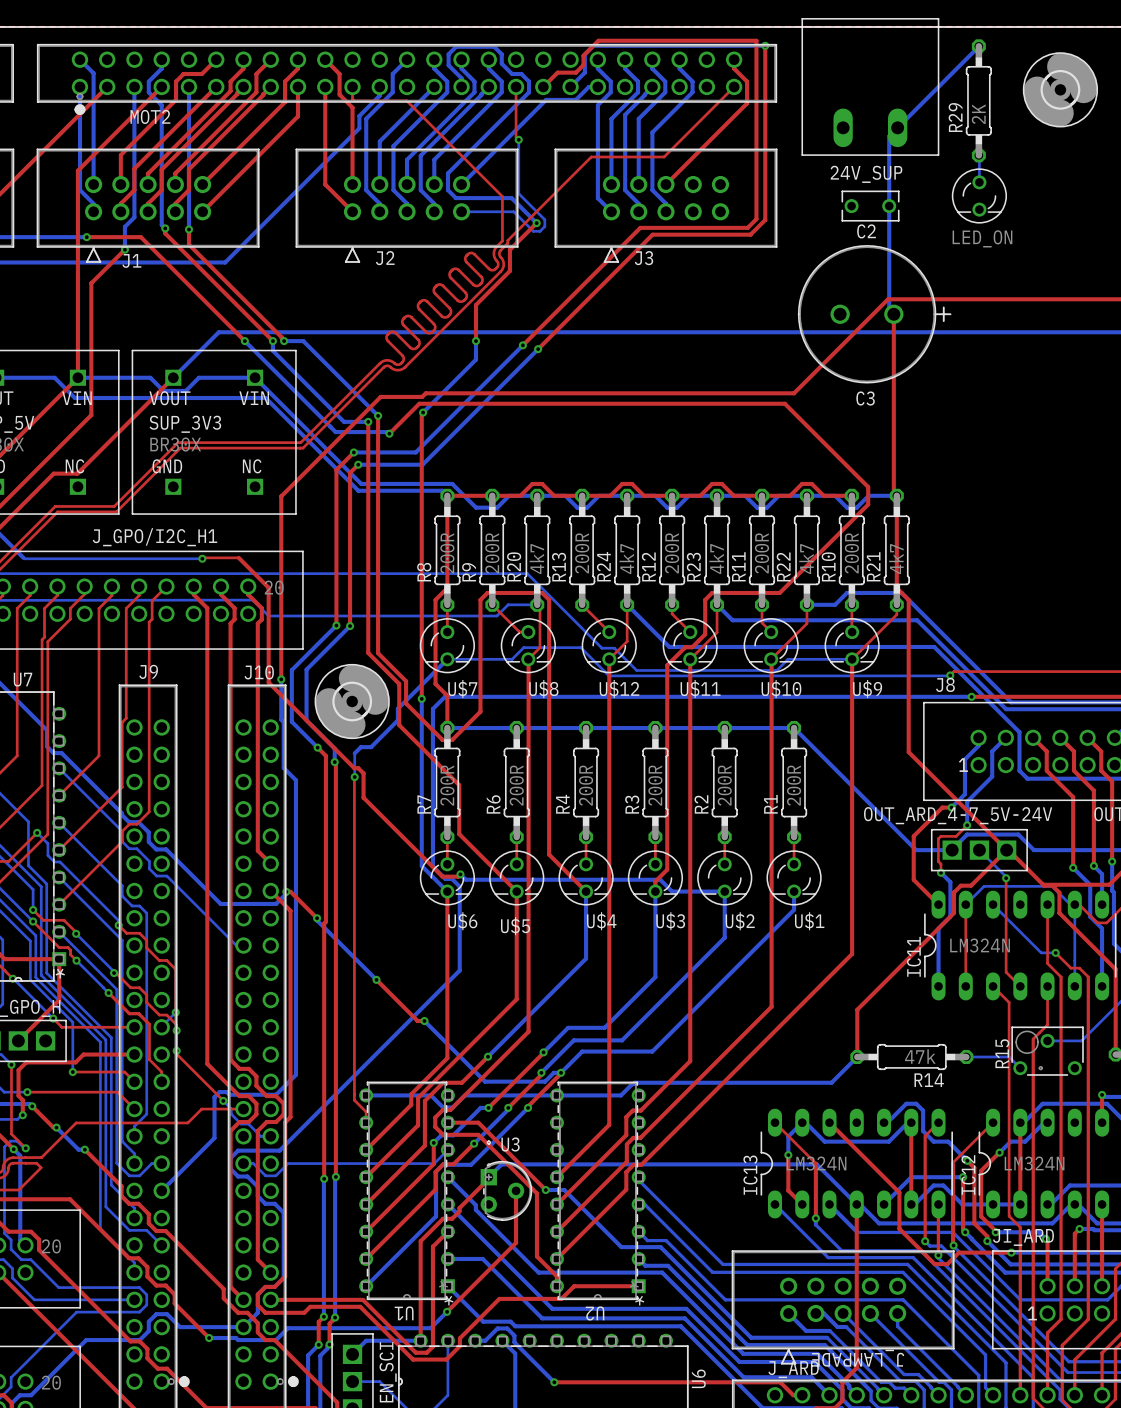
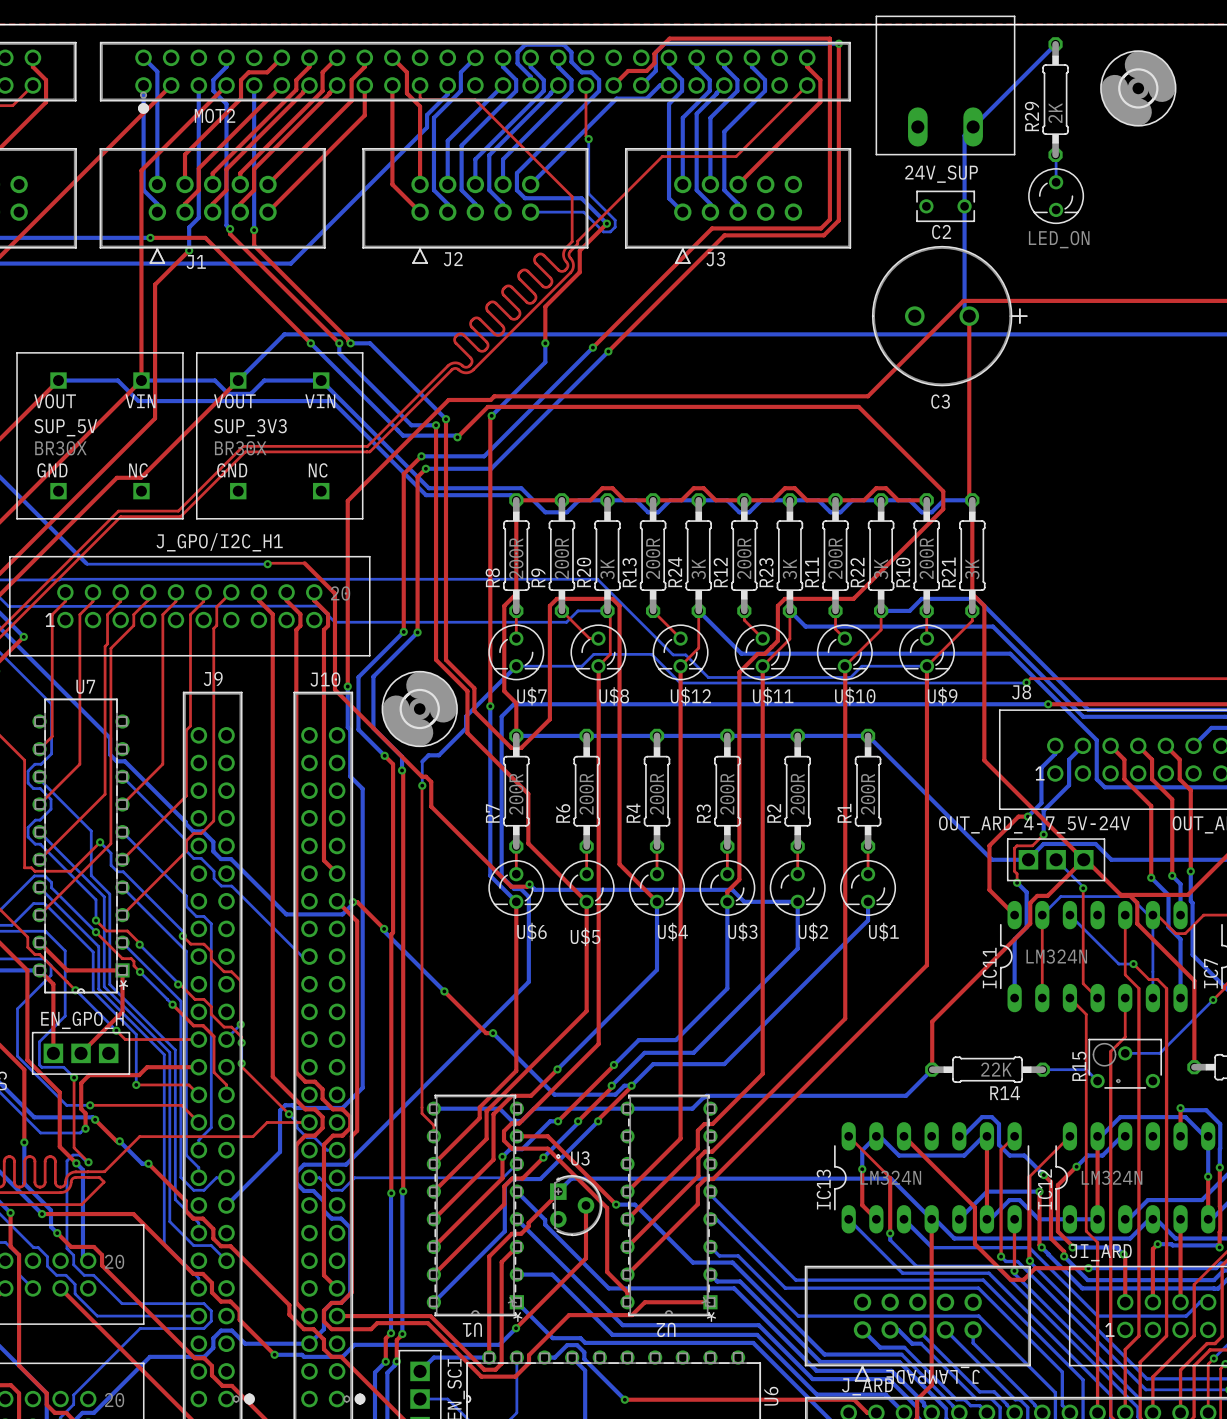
R20 value: 4k7 (536, 559) -> 3K (607, 569)
R24 value: 4k7 (626, 559) -> 3K (698, 569)
R23 value: 4k7 (716, 559) -> 3K (789, 569)
R22 value: 4k7 (806, 559) -> 3K (881, 569)
R21 value: 4k7 (896, 559) -> 3K (972, 569)
R14 value: 47k (920, 1056) -> 22K (996, 1069)

